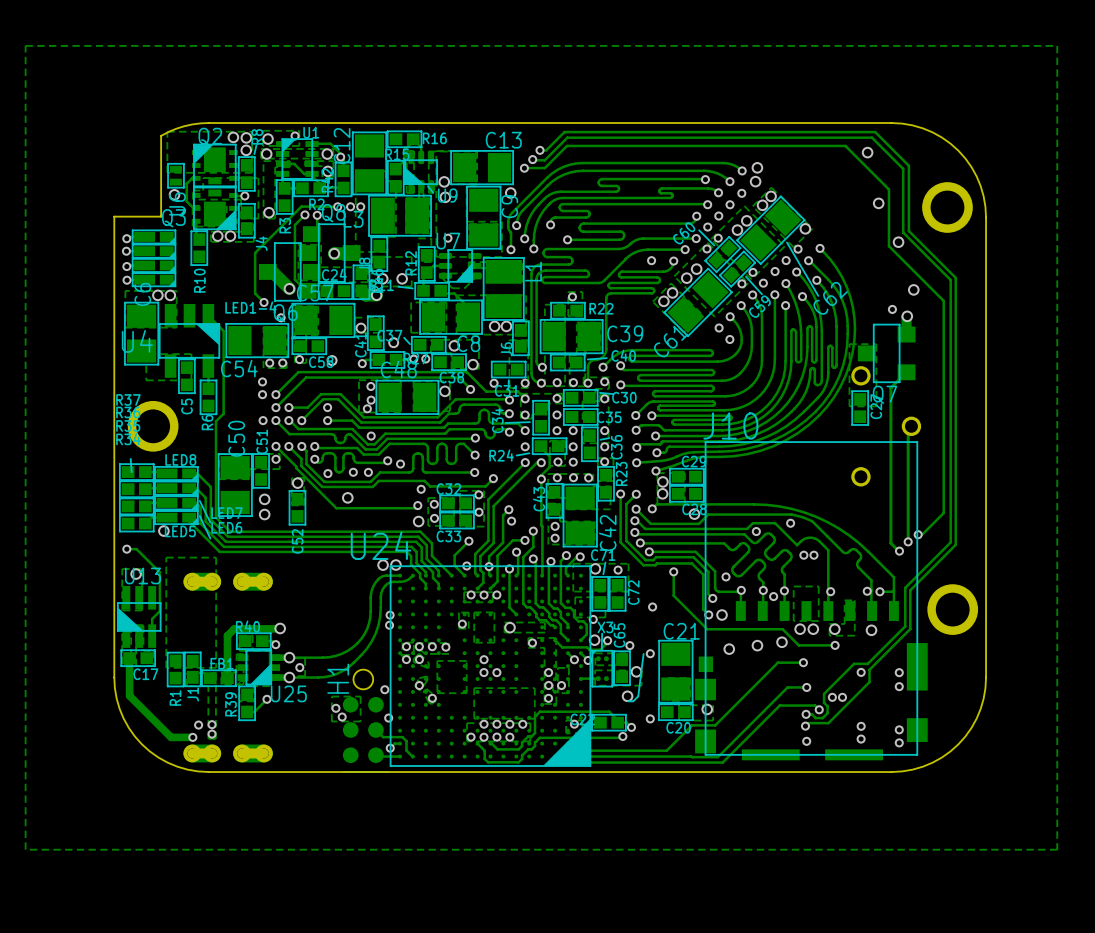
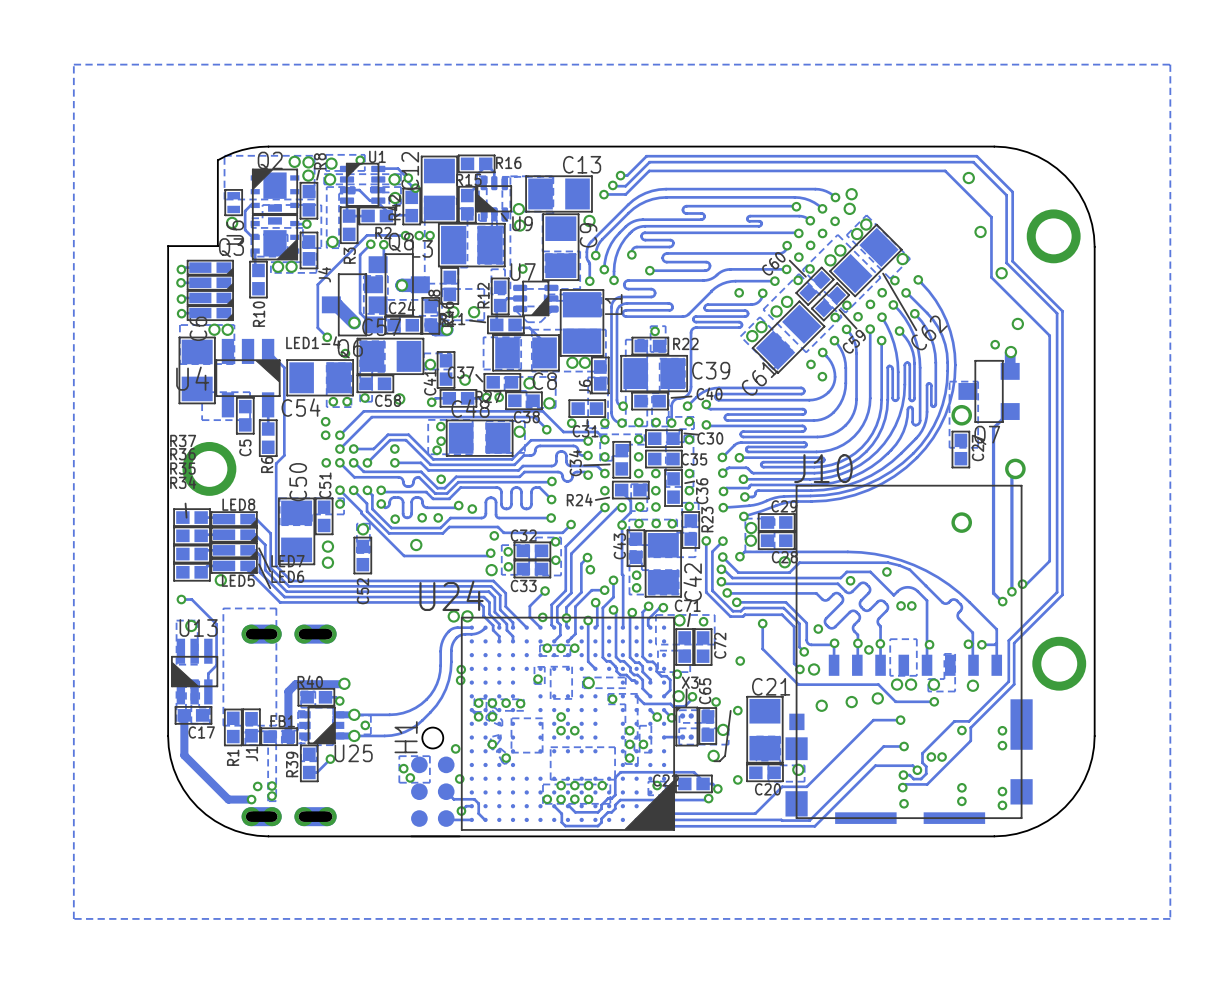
via: none -> (408, 178)
via: (340, 157) -> none
via: none -> (415, 188)

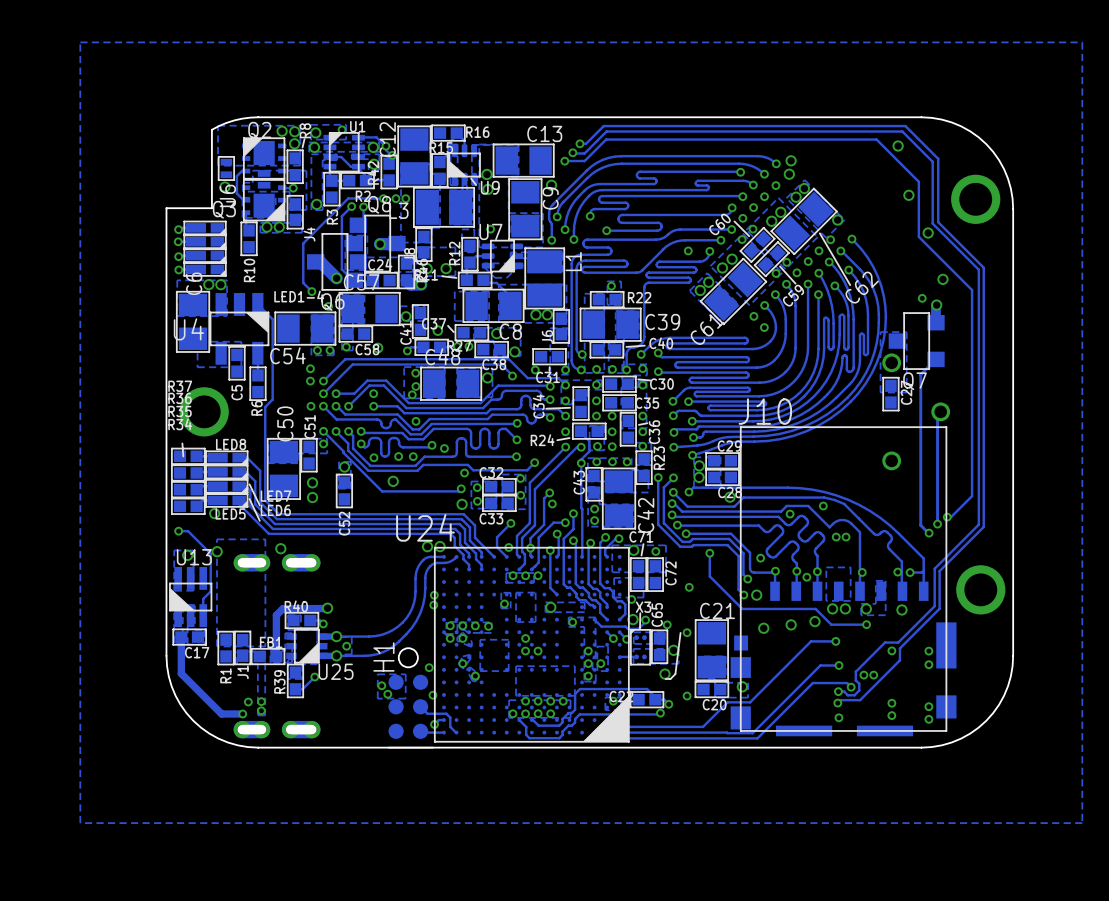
via: none -> (280, 548)
via: none -> (217, 551)

